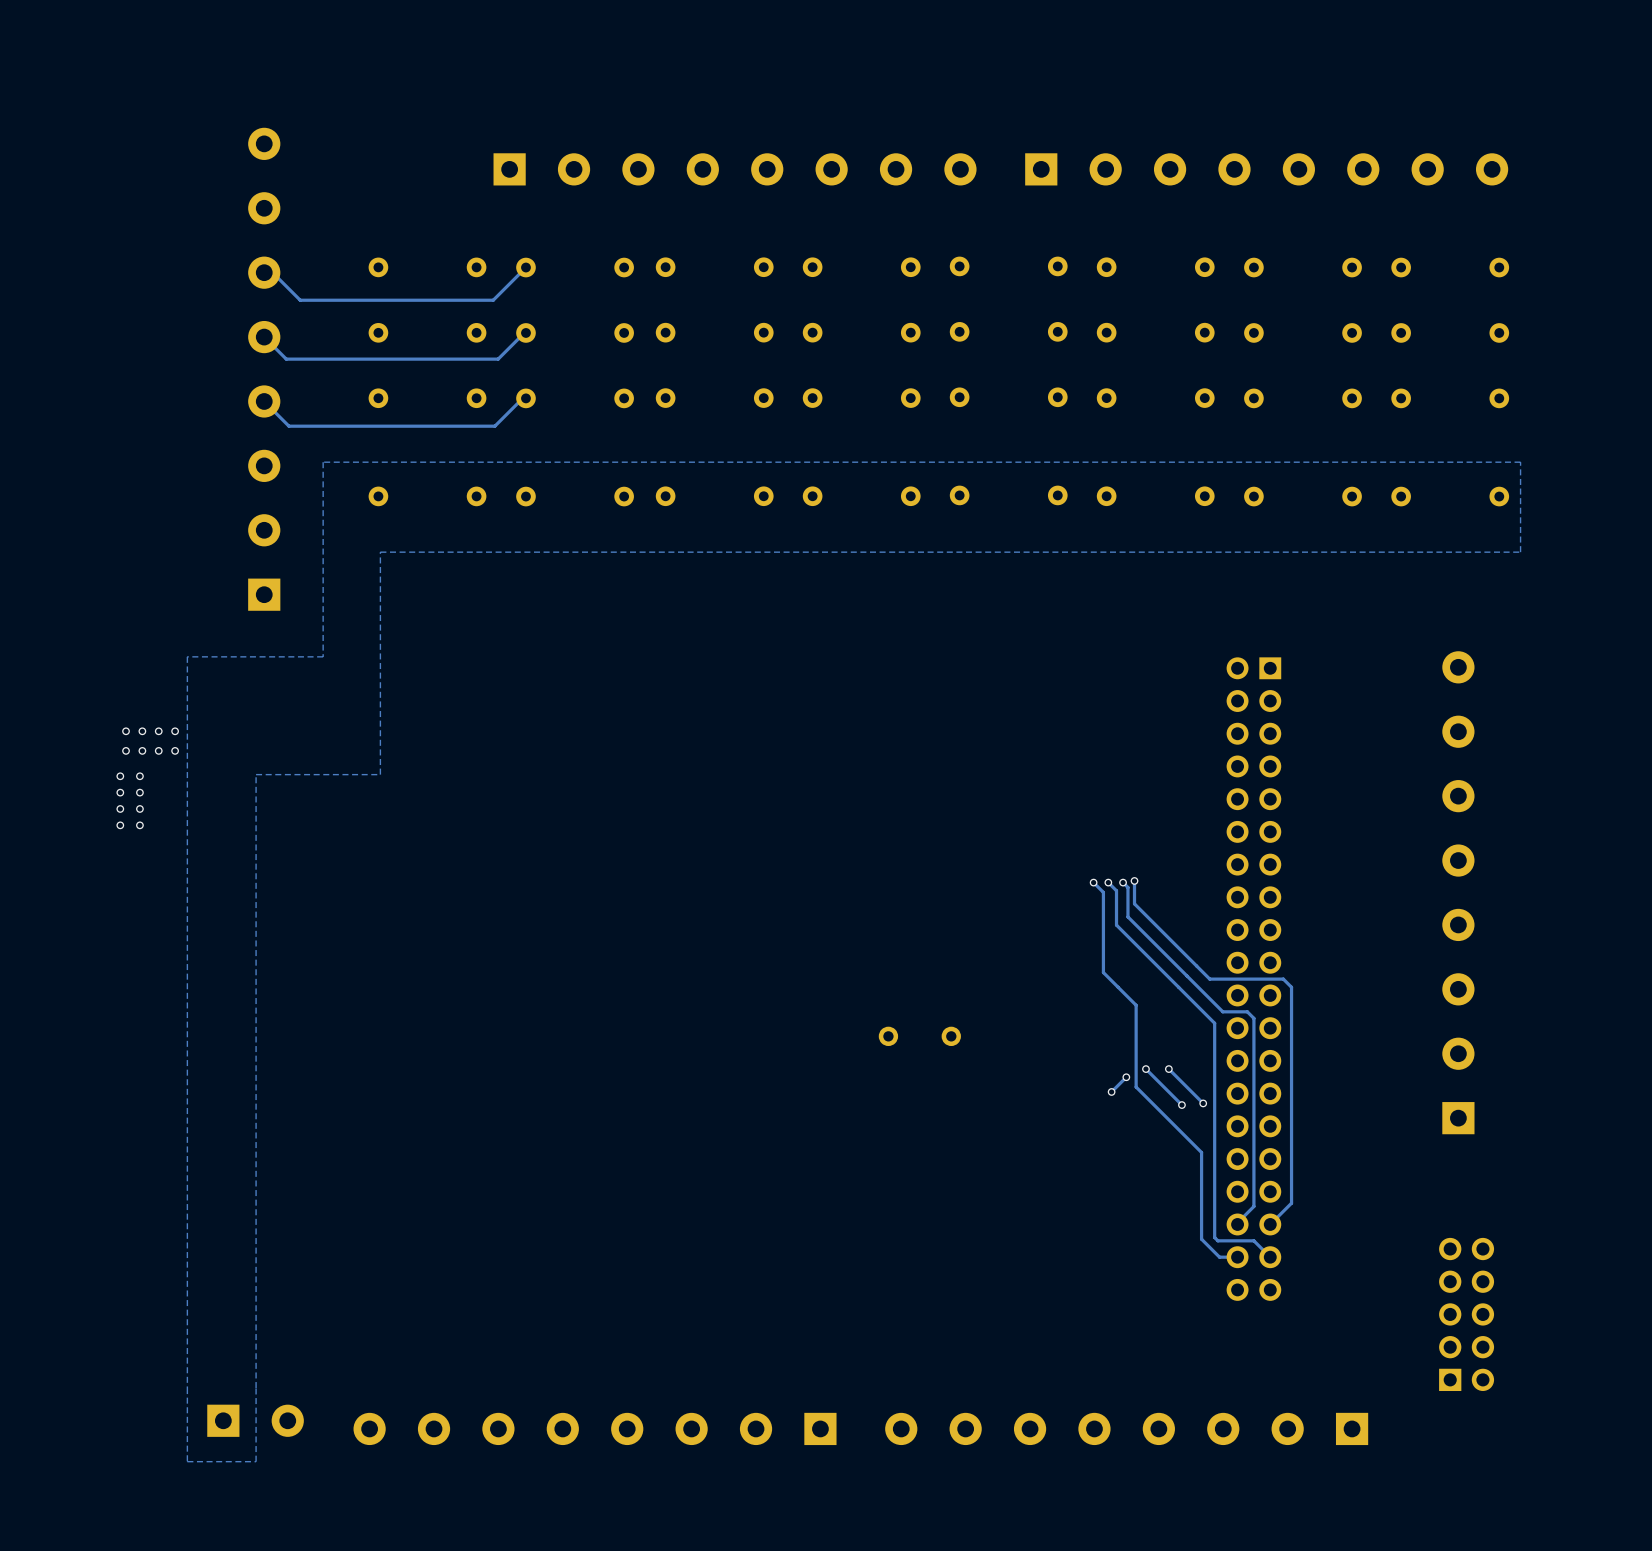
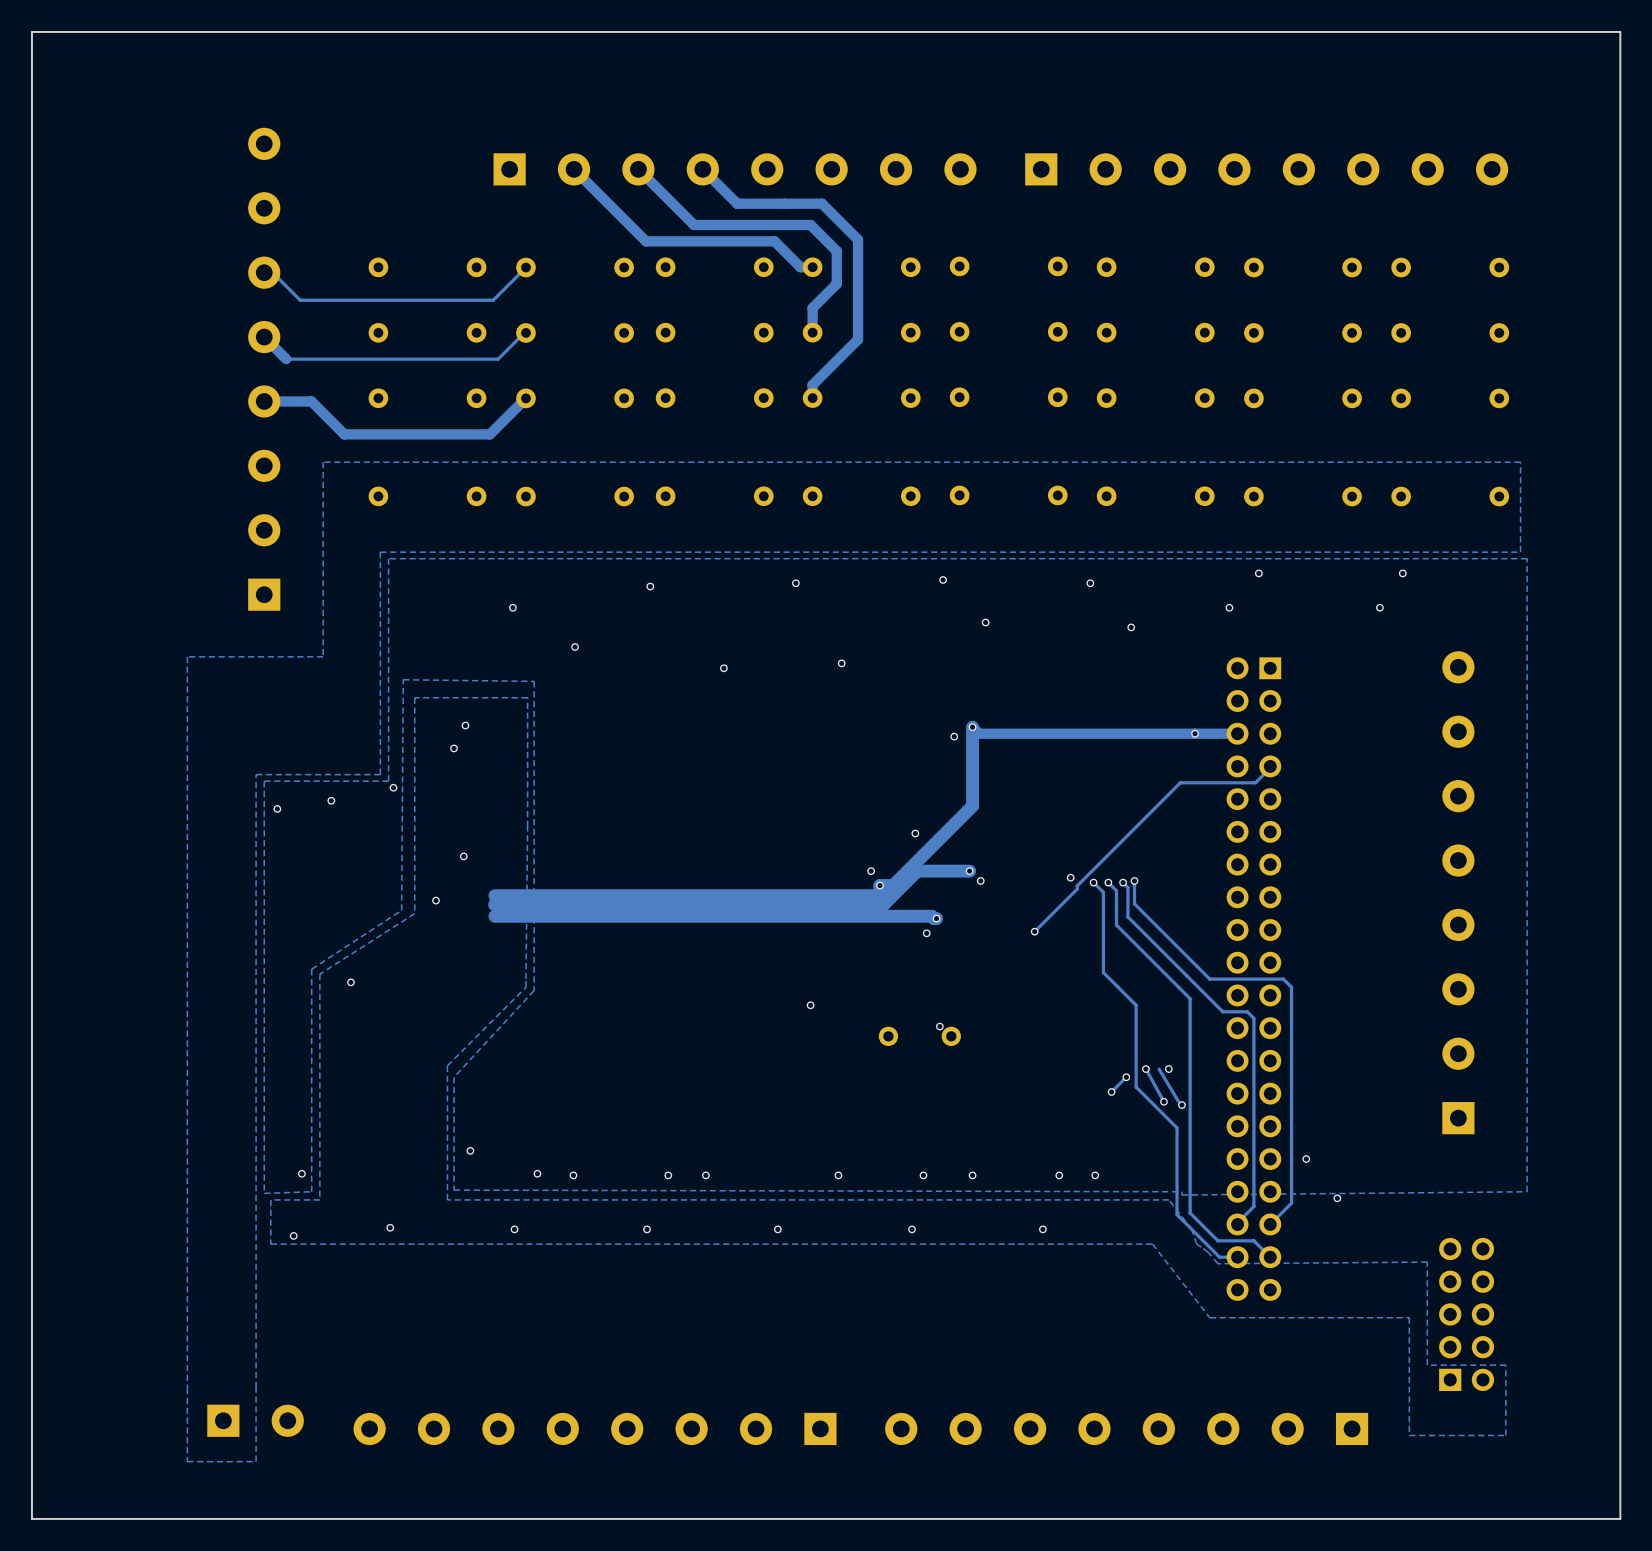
board edge: none -> (1620, 31) (31, 31) (31, 1518) (1620, 1518) (1620, 31)
track: none -> (574, 169) (646, 241) (774, 241) (800, 267) (812, 267)
track: none -> (638, 169) (694, 224) (810, 224) (836, 251) (836, 283) (812, 308) (812, 332)
track: none -> (702, 169) (737, 203) (822, 203) (858, 239) (858, 339) (812, 384) (812, 398)
track width: thin (264, 337) (286, 359) -> thick (264, 337) (286, 359)
track: (522, 398) (494, 426) (288, 426) (264, 401) -> (525, 398) (489, 434) (344, 434) (311, 401) (264, 401)
zone outline: none -> (1527, 558) (1527, 1191) (1181, 1195) (1181, 1191) (454, 1190) (454, 1077) (534, 990) (534, 681) (403, 679) (401, 910) (311, 969) (311, 1191) (264, 1193) (264, 781) (388, 781) (388, 558) (1527, 558)
via: none -> (1258, 573)
via: none -> (1402, 573)
via: none -> (943, 579)
via: none -> (795, 583)
via: none -> (1090, 583)
via: none -> (650, 586)
via: none -> (512, 607)
via: none -> (1229, 607)
via: none -> (1379, 607)
via: none -> (985, 622)
via: none -> (1131, 627)
via: none -> (575, 647)
via: none -> (841, 663)
via: none -> (723, 668)
zone outline: none -> (527, 697) (525, 987) (447, 1065) (447, 1199) (1168, 1199) (1191, 1229) (1196, 1244) (1208, 1252) (1217, 1263) (1427, 1262) (1427, 1365) (1505, 1365) (1505, 1435) (1409, 1435) (1409, 1317) (1209, 1317) (1152, 1244) (270, 1244) (270, 1199) (319, 1199) (319, 974) (414, 913) (414, 697) (527, 697)
via: none -> (465, 725)
via: none -> (972, 727)
via: (126, 731) -> none
via: (142, 731) -> none
via: (158, 731) -> none
via: (175, 731) -> none
via: none -> (1195, 733)
track: none -> (1237, 733) (979, 733) (972, 727) (972, 806) (893, 885) (879, 885) (879, 893) (877, 895) (494, 895)
via: none -> (954, 736)
via: none -> (454, 748)
via: (126, 750) -> none
via: (142, 750) -> none
via: (158, 750) -> none
via: (175, 750) -> none
track: none -> (1270, 766) (1255, 782) (1180, 782) (1077, 885) (1077, 889) (1034, 931)
via: (120, 776) -> none
via: (139, 776) -> none
via: none -> (393, 787)
via: (120, 792) -> none
via: (139, 792) -> none
via: none -> (331, 800)
via: (120, 808) -> none
via: (139, 808) -> none
via: none -> (277, 808)
via: (120, 825) -> none
via: (139, 825) -> none
via: none -> (915, 833)
via: none -> (463, 856)
via: none -> (871, 871)
track: none -> (969, 871) (917, 871) (883, 904) (494, 904)
via: none -> (969, 871)
via: none -> (1070, 877)
via: none -> (980, 880)
via: none -> (879, 885)
via: none -> (436, 900)
track: none -> (494, 916) (931, 916) (936, 918)
via: none -> (936, 918)
via: none -> (1034, 931)
via: none -> (926, 933)
via: none -> (350, 982)
track: (1190, 998) (1214, 1023) (1214, 1237) -> (1190, 998) (1190, 1213) (1214, 1237)
via: none -> (810, 1005)
via: none -> (939, 1026)
track: (1145, 1069) (1181, 1105) -> (1145, 1069) (1163, 1101)
track: none -> (1159, 1069) (1178, 1101)
track: (1168, 1069) (1203, 1103) -> none
via position: (1203, 1103) -> (1163, 1101)
track: (1177, 1127) (1201, 1152) (1201, 1239) -> (1177, 1127) (1177, 1214) (1201, 1239)
via: none -> (470, 1150)
via: none -> (1306, 1159)
via: none -> (301, 1173)
via: none -> (537, 1173)
via: none -> (573, 1175)
via: none -> (668, 1175)
via: none -> (705, 1175)
via: none -> (838, 1175)
via: none -> (923, 1175)
via: none -> (972, 1175)
via: none -> (1059, 1175)
via: none -> (1095, 1175)
via: none -> (1337, 1198)
via: none -> (390, 1227)
via: none -> (514, 1229)
via: none -> (647, 1229)
via: none -> (777, 1229)
via: none -> (912, 1229)
via: none -> (1042, 1229)
via: none -> (293, 1235)

